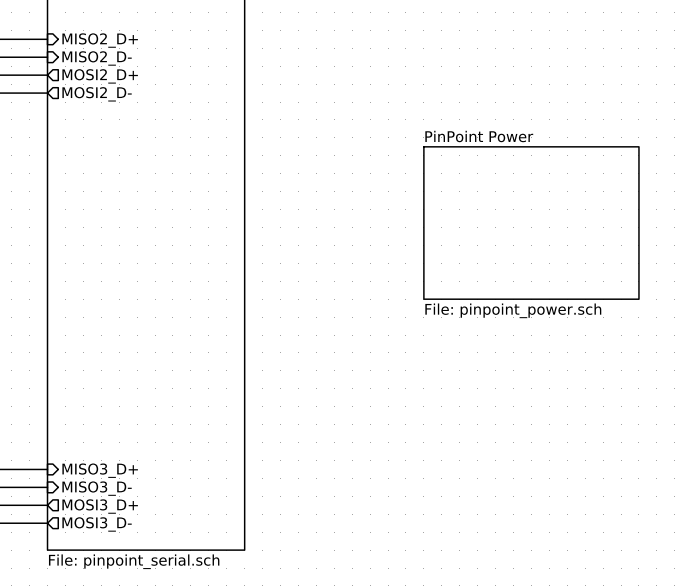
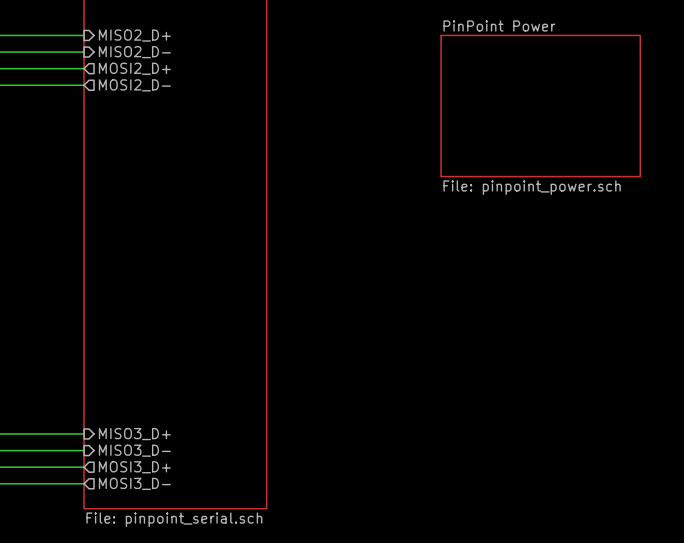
sheet PinPoint Power position: (531, 223) -> (540, 106)

